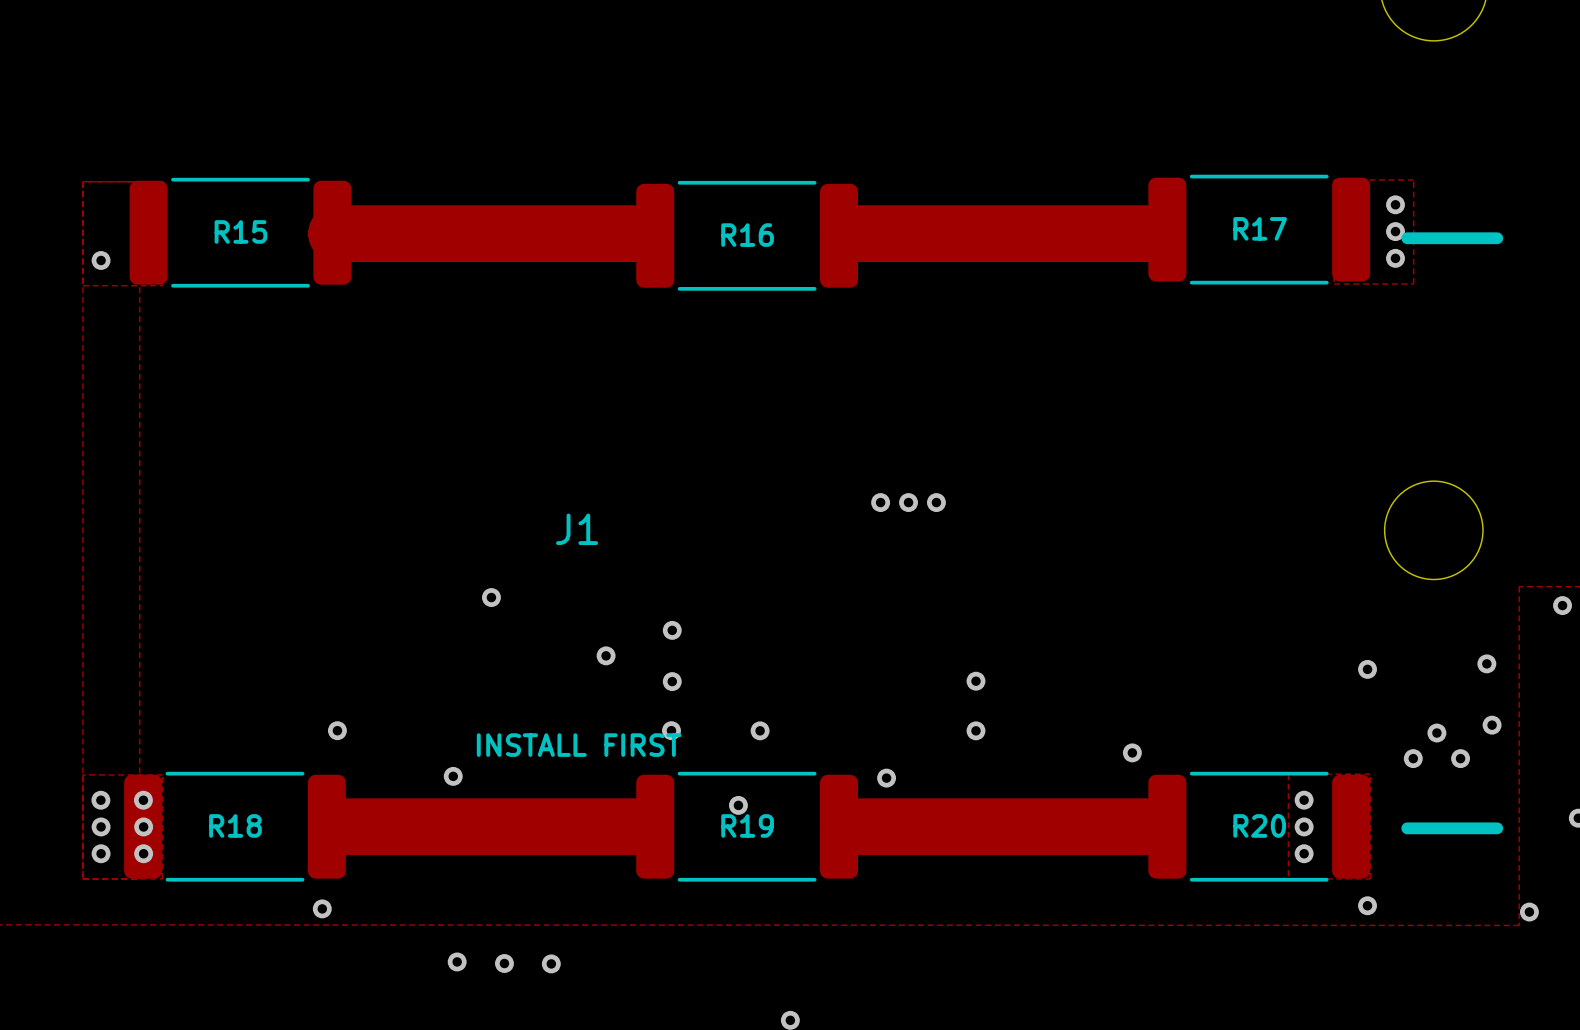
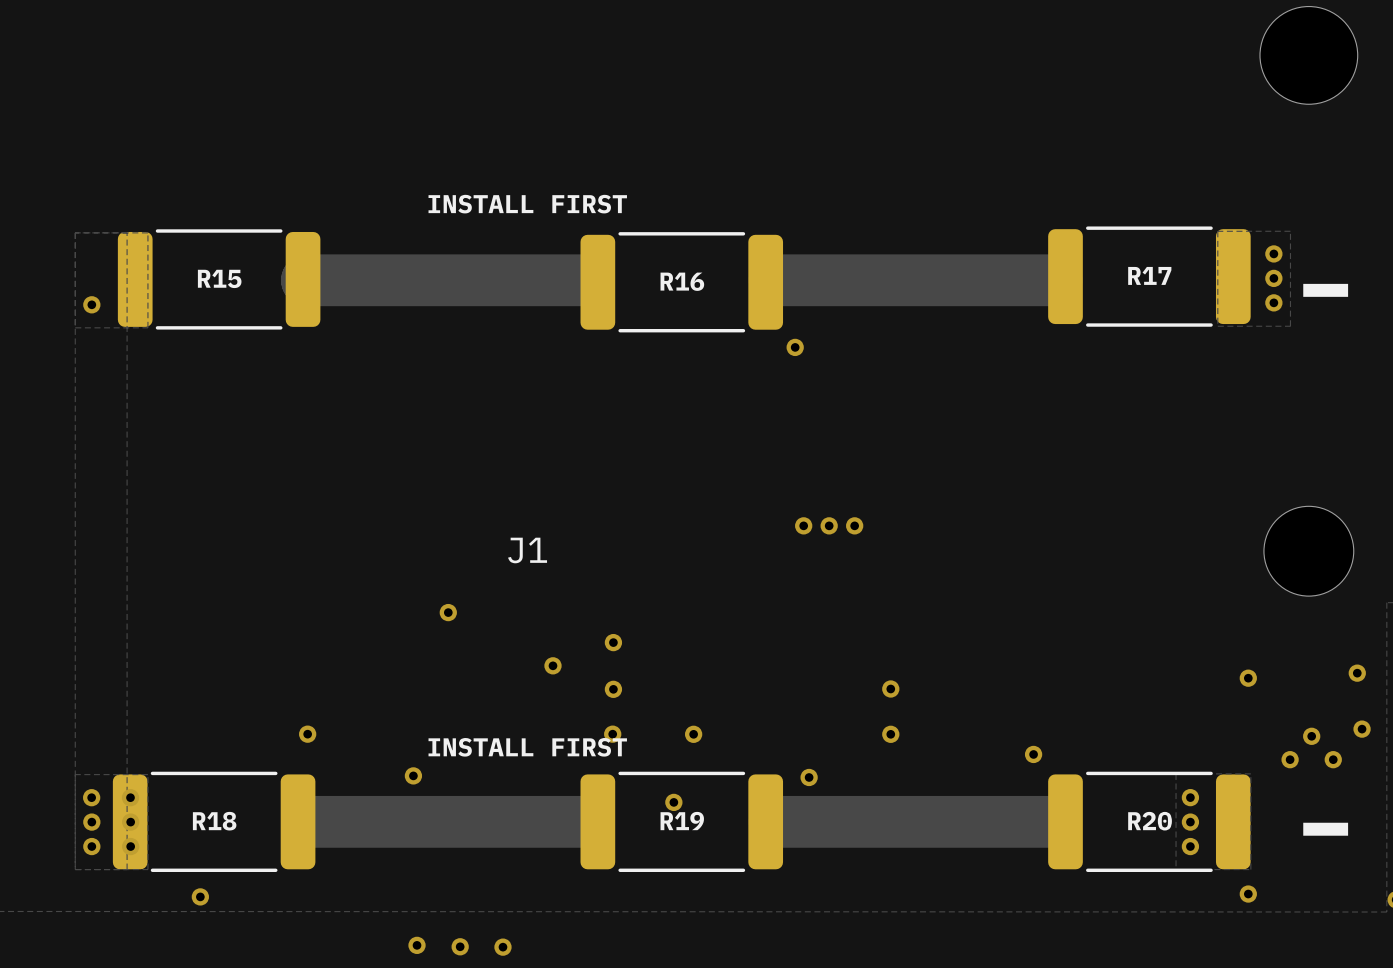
text: none -> INSTALL FIRST (527, 204)
via: none -> (795, 347)
via position: (322, 908) -> (200, 896)

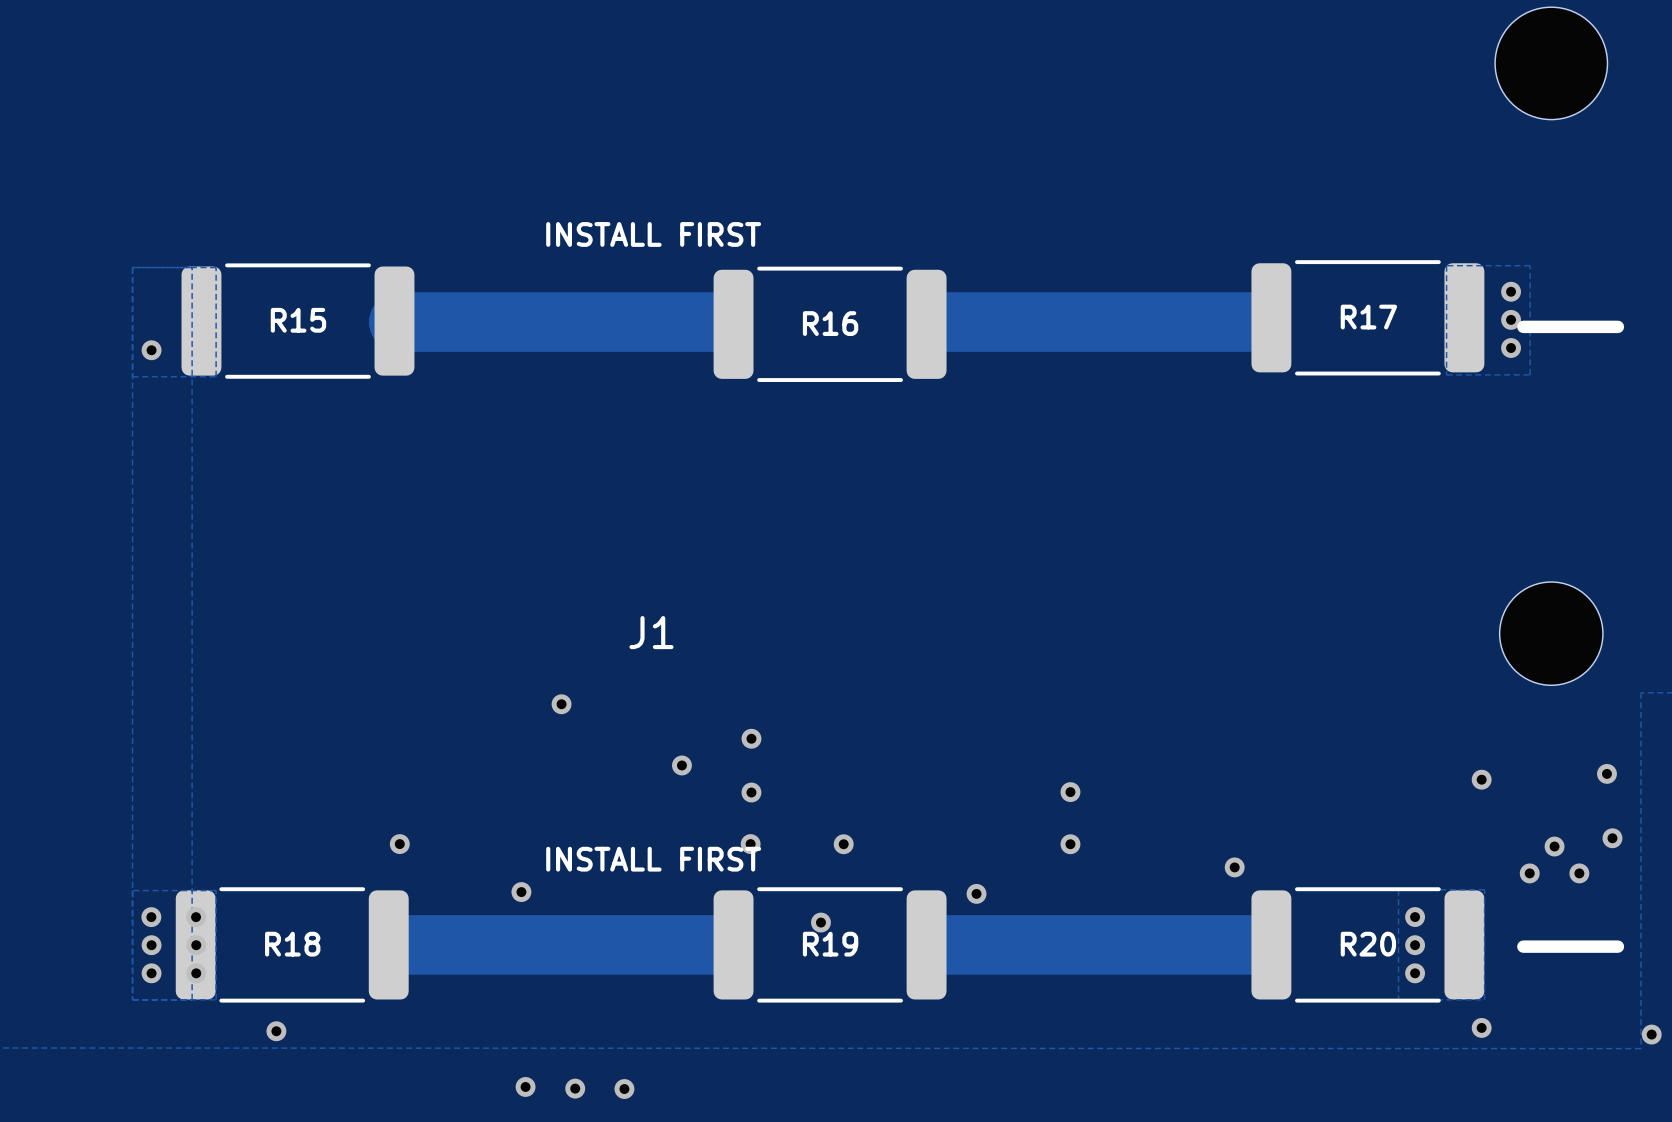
via: (795, 347) -> none
via: (803, 525) -> none
via: (829, 525) -> none
via: (854, 525) -> none

